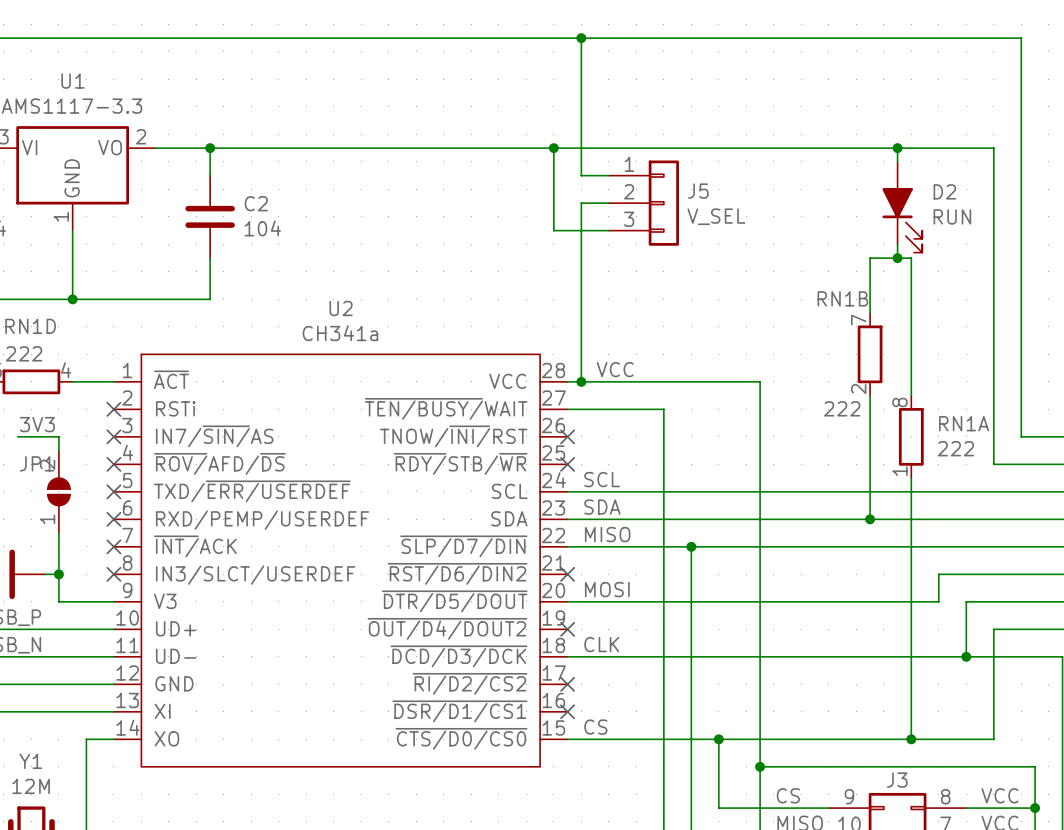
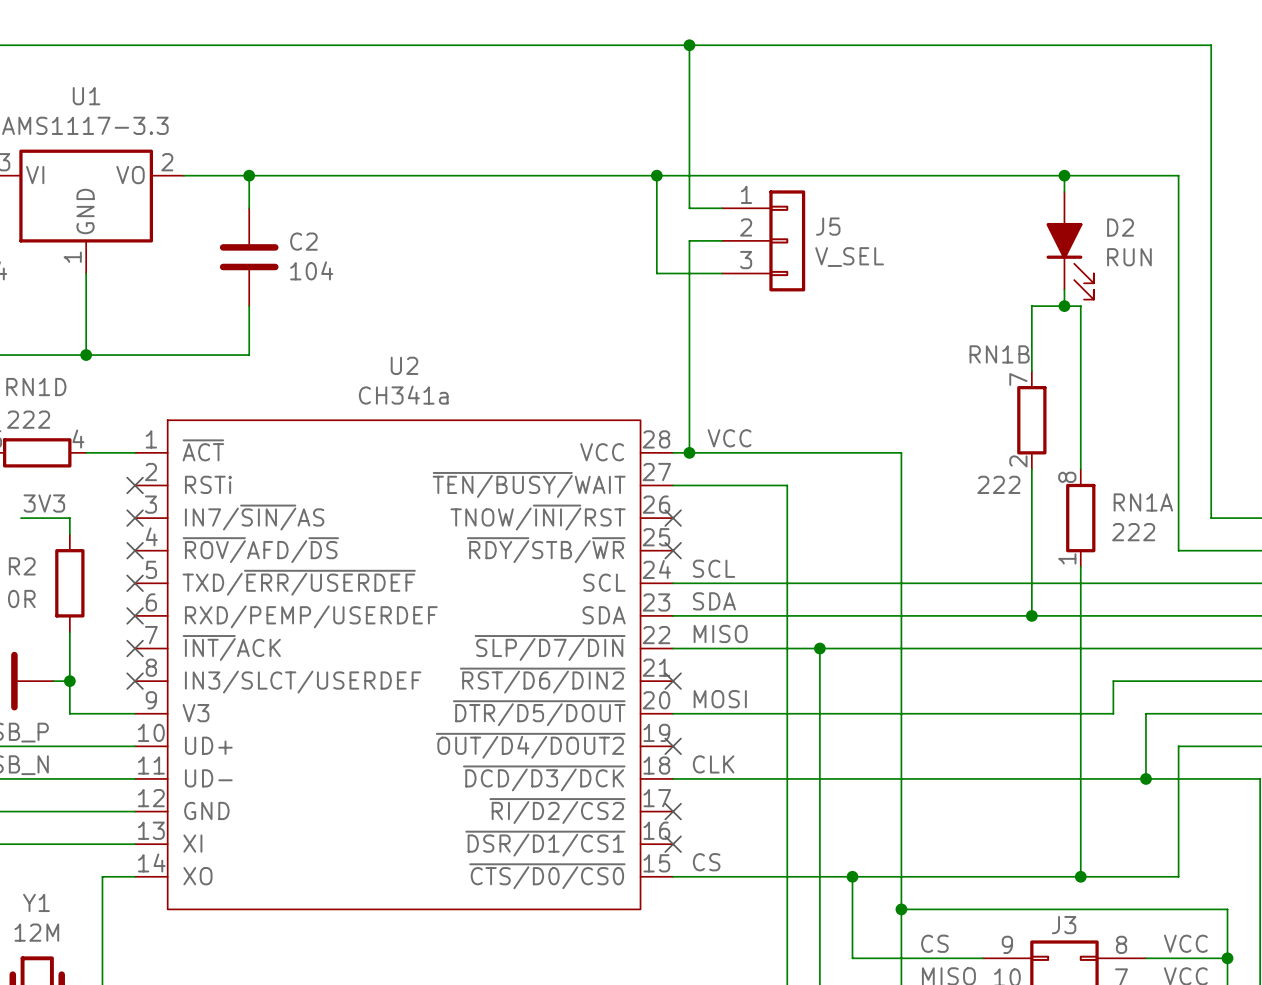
JP1: (58, 491) -> none
R2: none -> 0R (69, 583)

